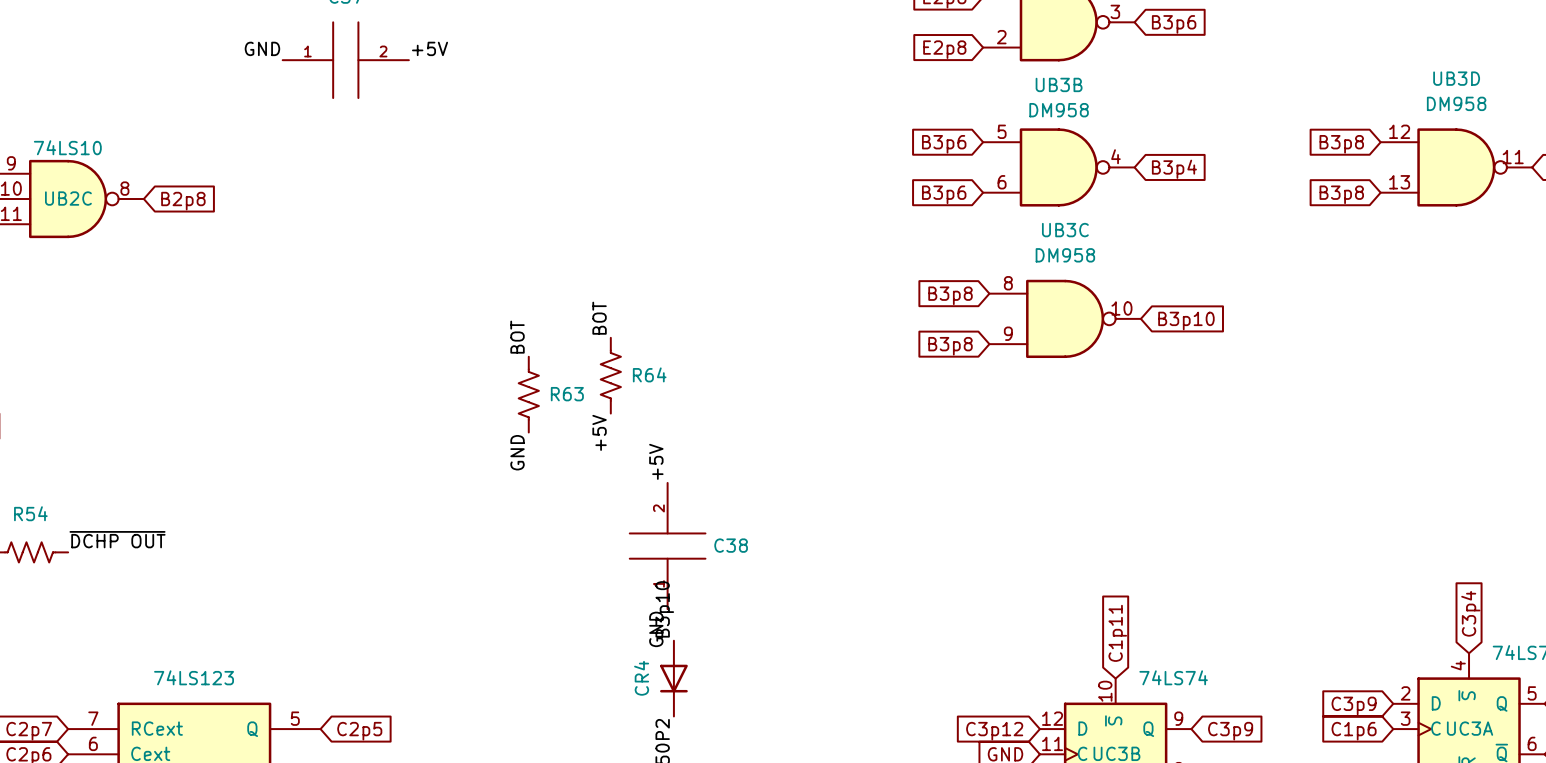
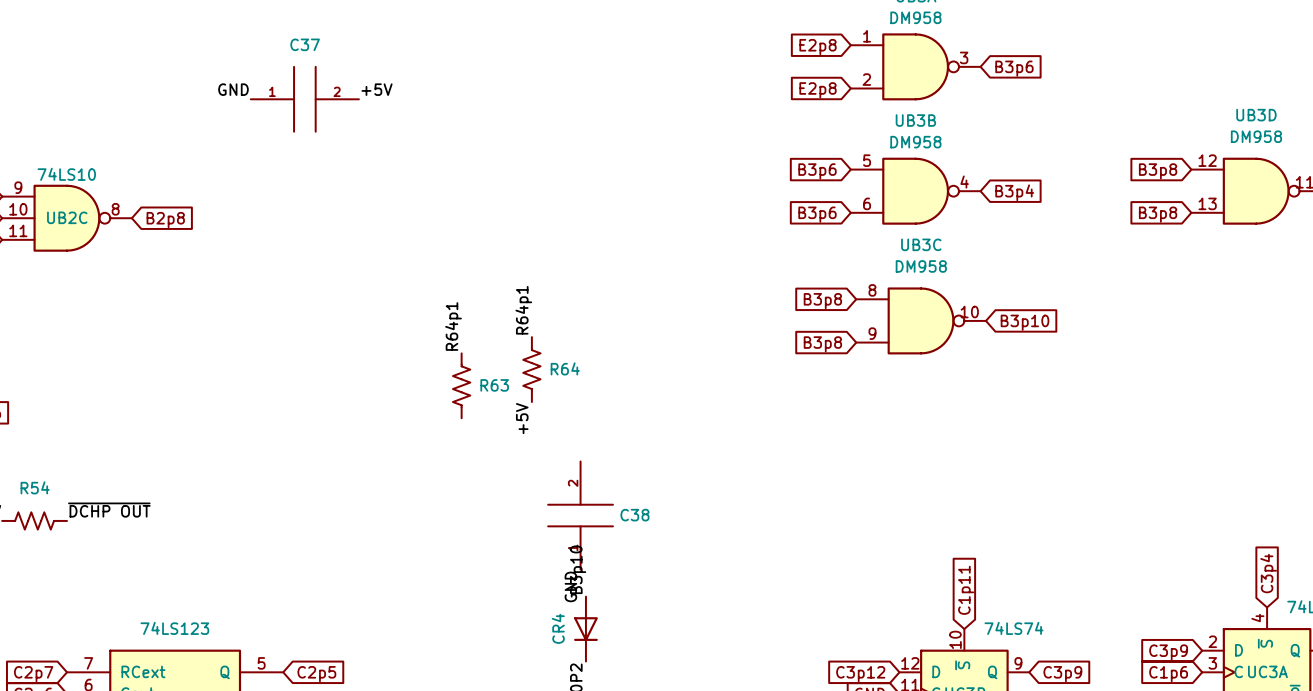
label: BOT (599, 318) -> R64p1 (523, 310)
label: BOT (517, 337) -> R64p1 (453, 326)
label: GND (517, 452) -> none
label: +5V (656, 461) -> none

